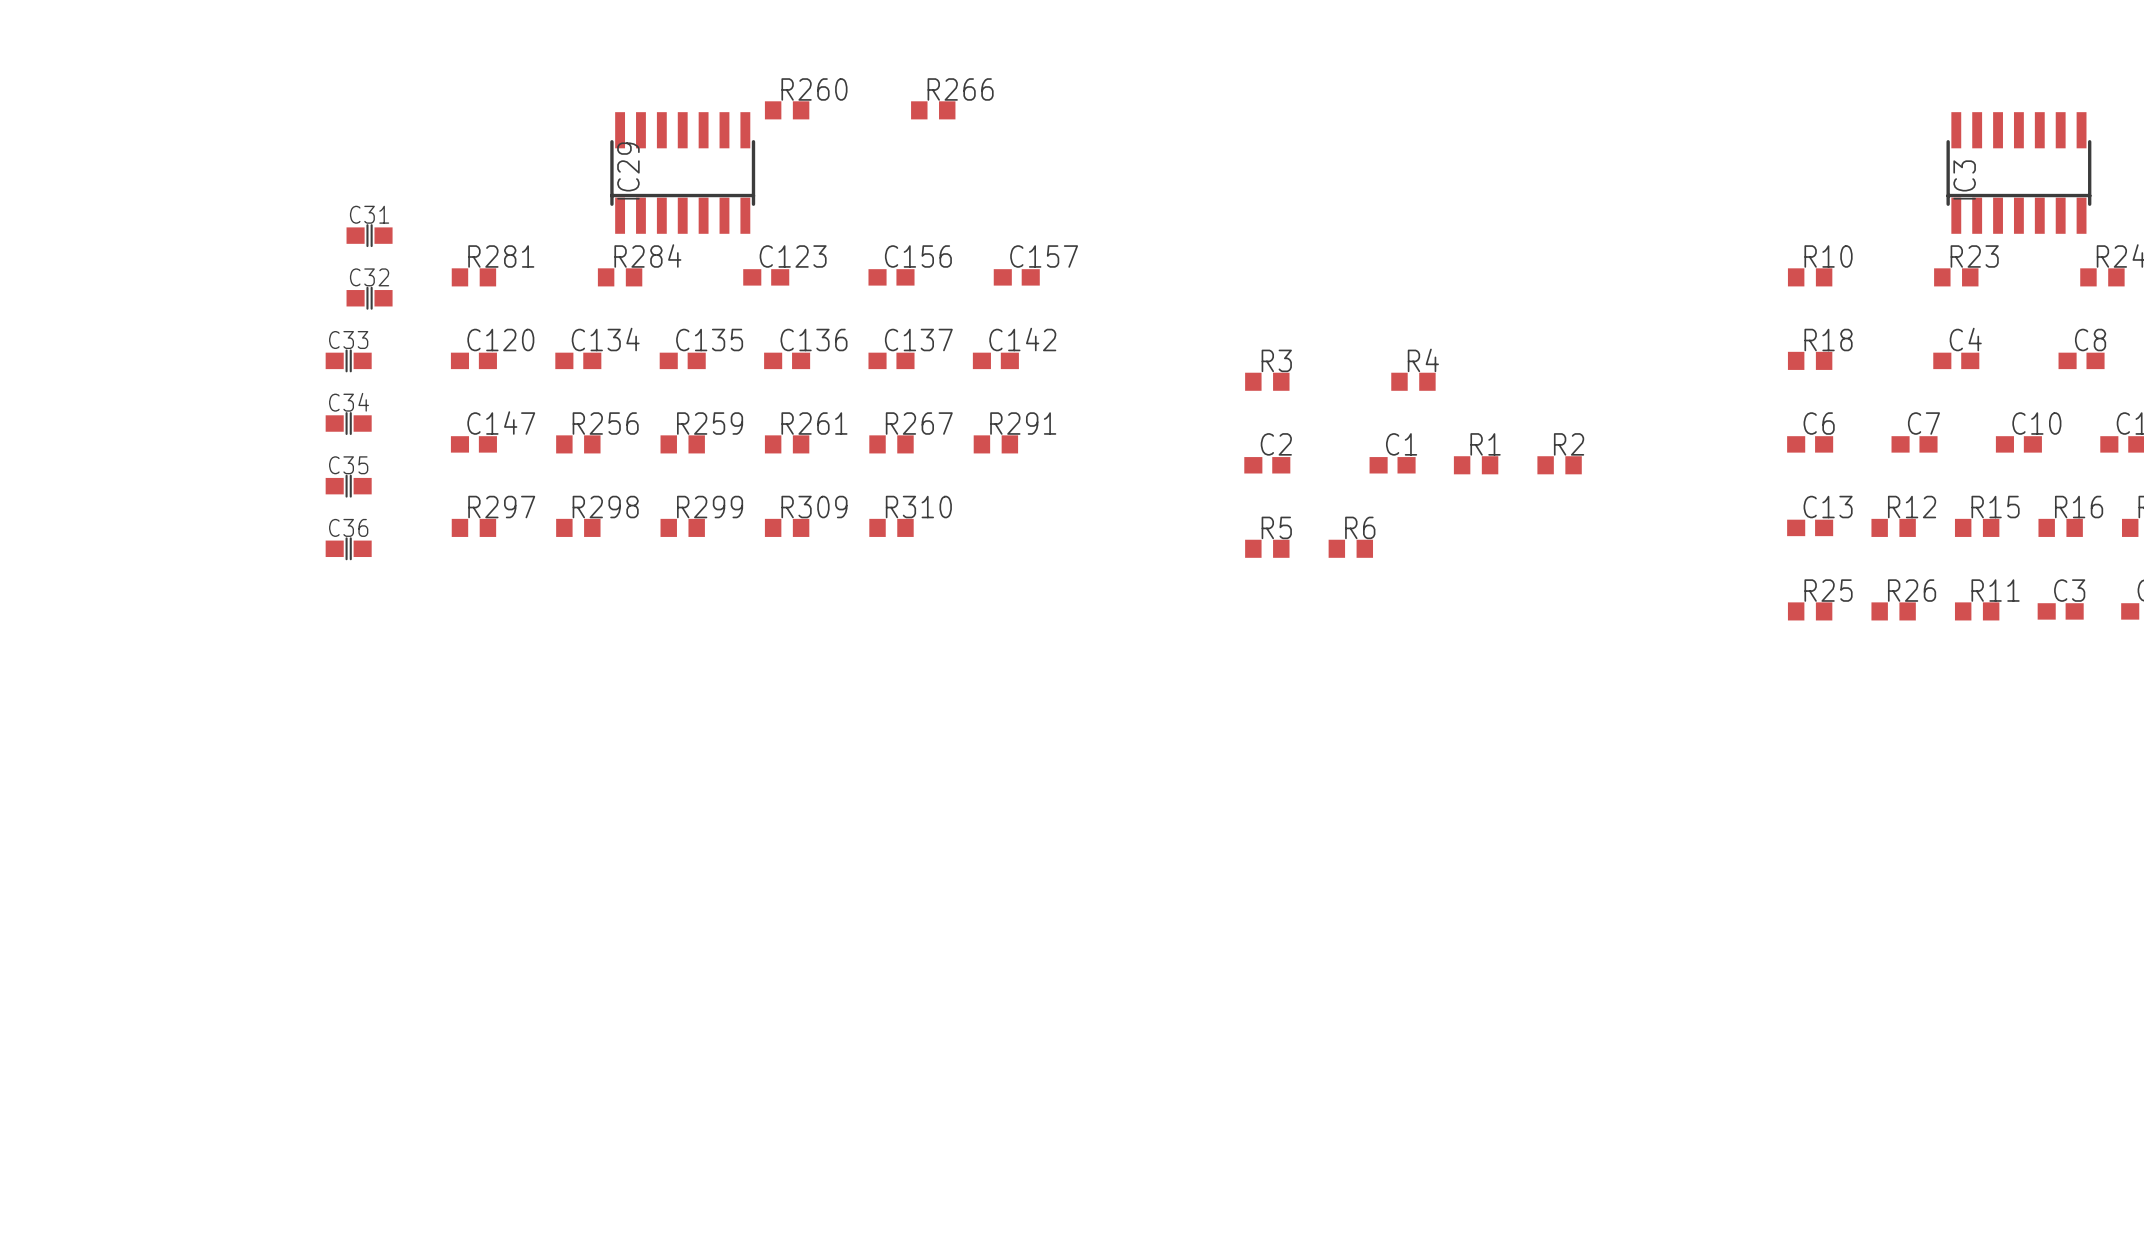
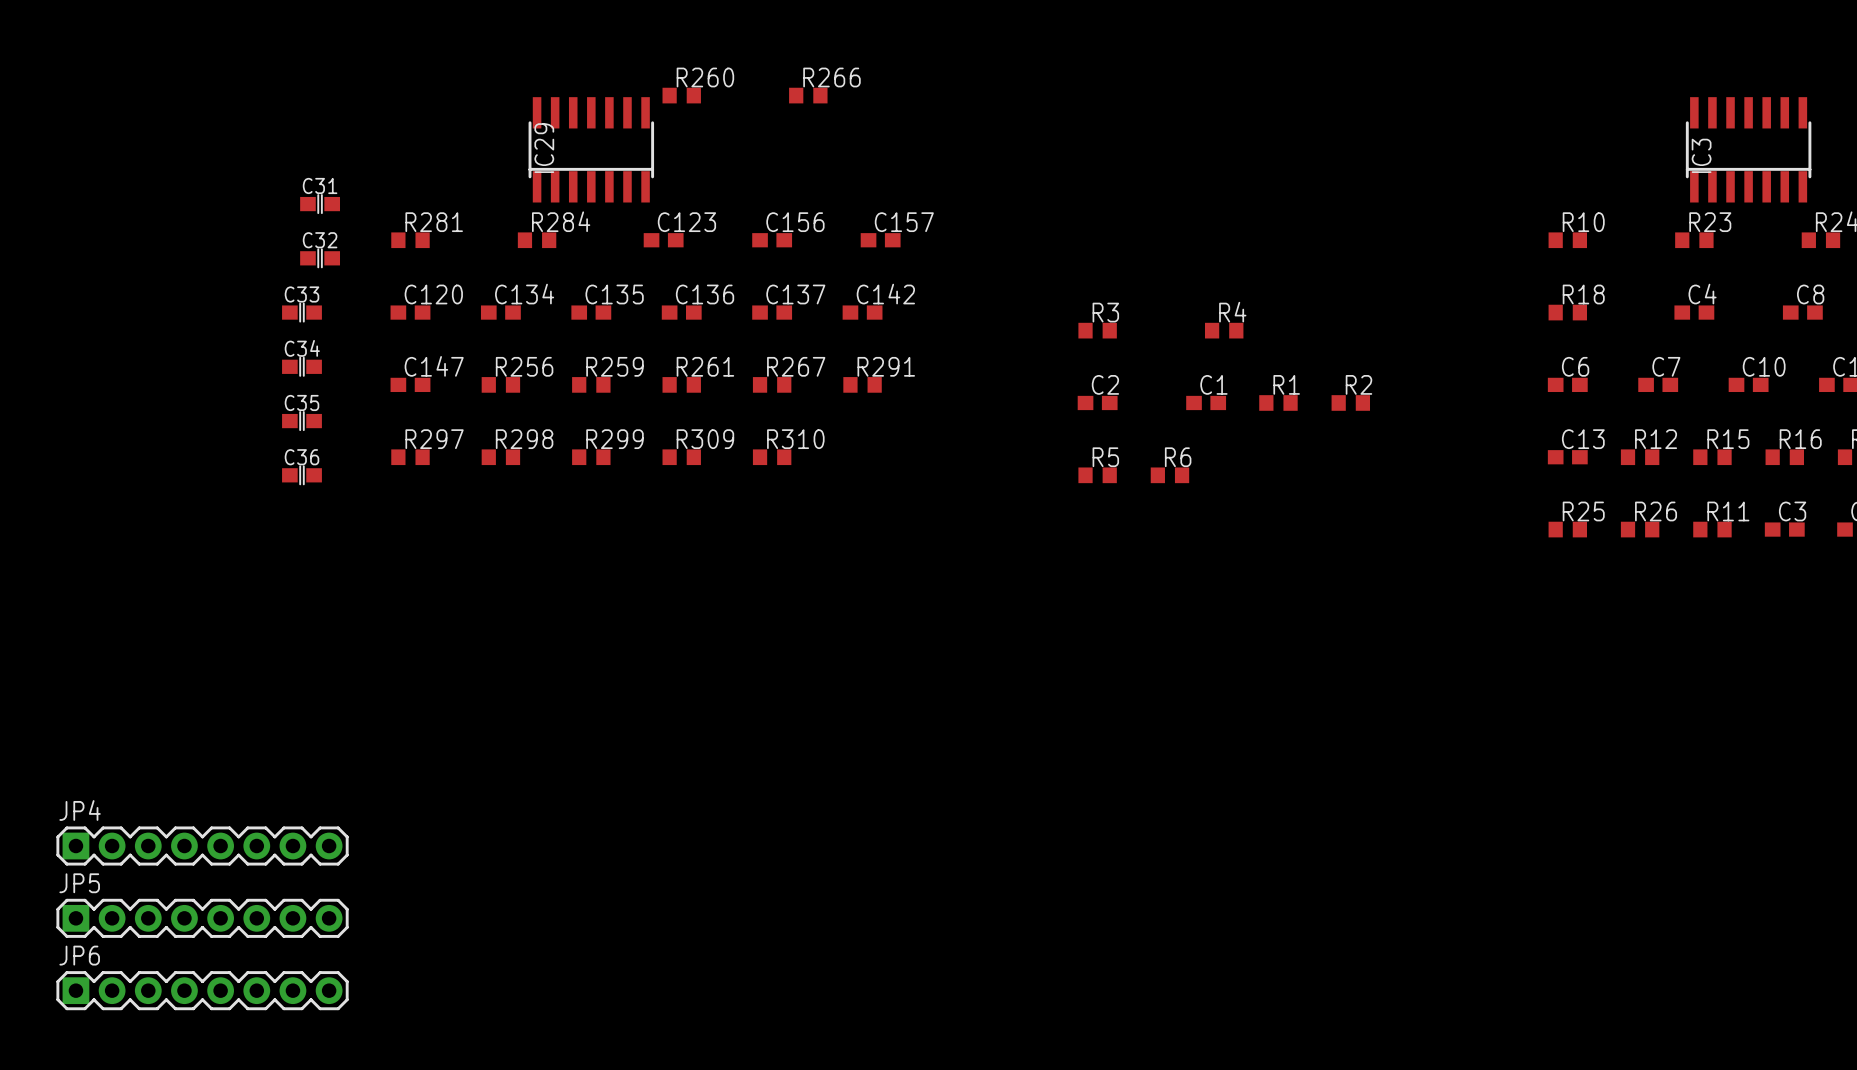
JP4: none -> (202, 846)
JP5: none -> (202, 918)
JP6: none -> (202, 990)

